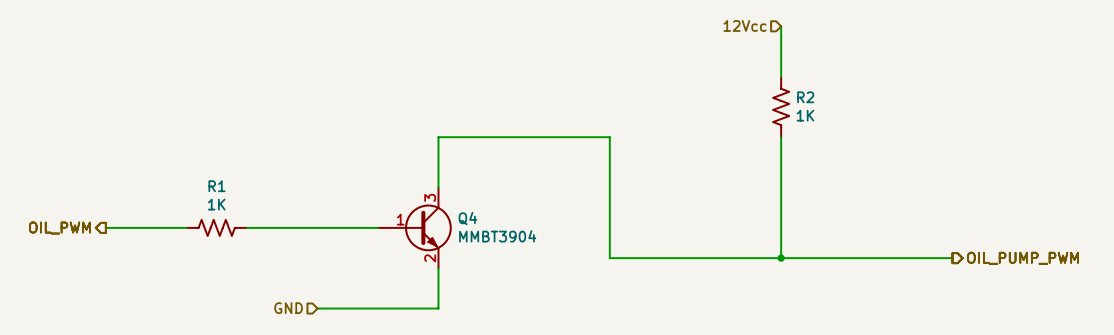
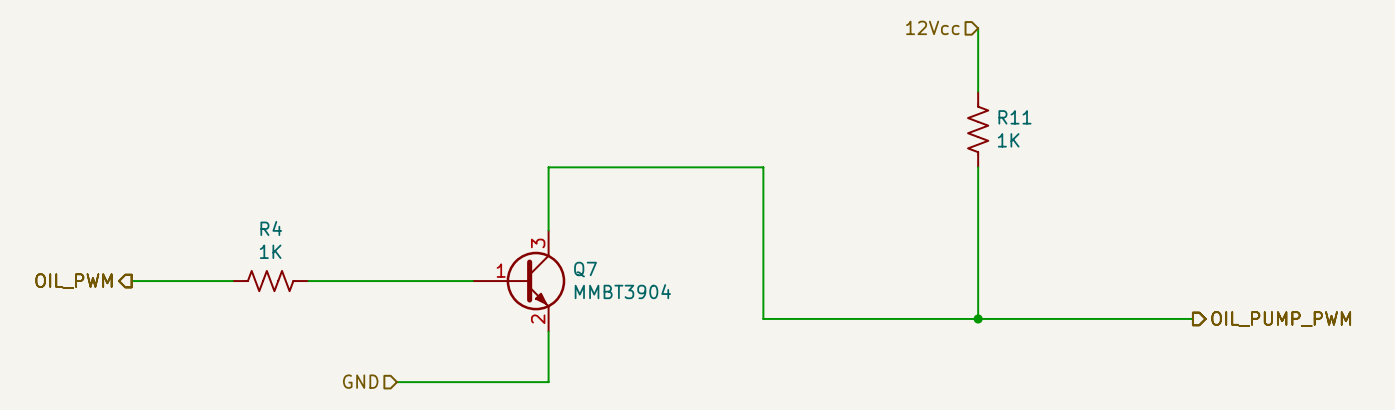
R2 name: R2 (805, 97) -> R11 (1014, 117)
R1 name: R1 (216, 186) -> R4 (271, 228)
Q4 name: Q4 (467, 218) -> Q7 (585, 269)

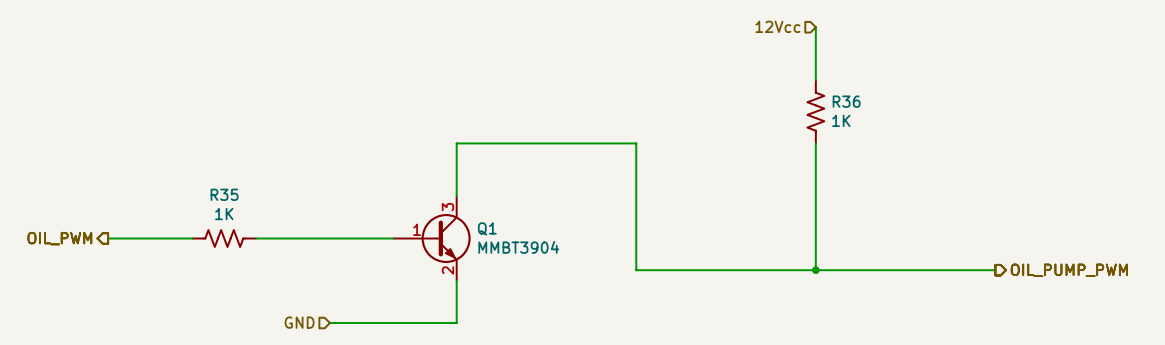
R11 name: R11 (1014, 117) -> R36 (846, 101)
R4 name: R4 (271, 228) -> R35 (224, 194)
Q7 name: Q7 (585, 269) -> Q1 (487, 228)

